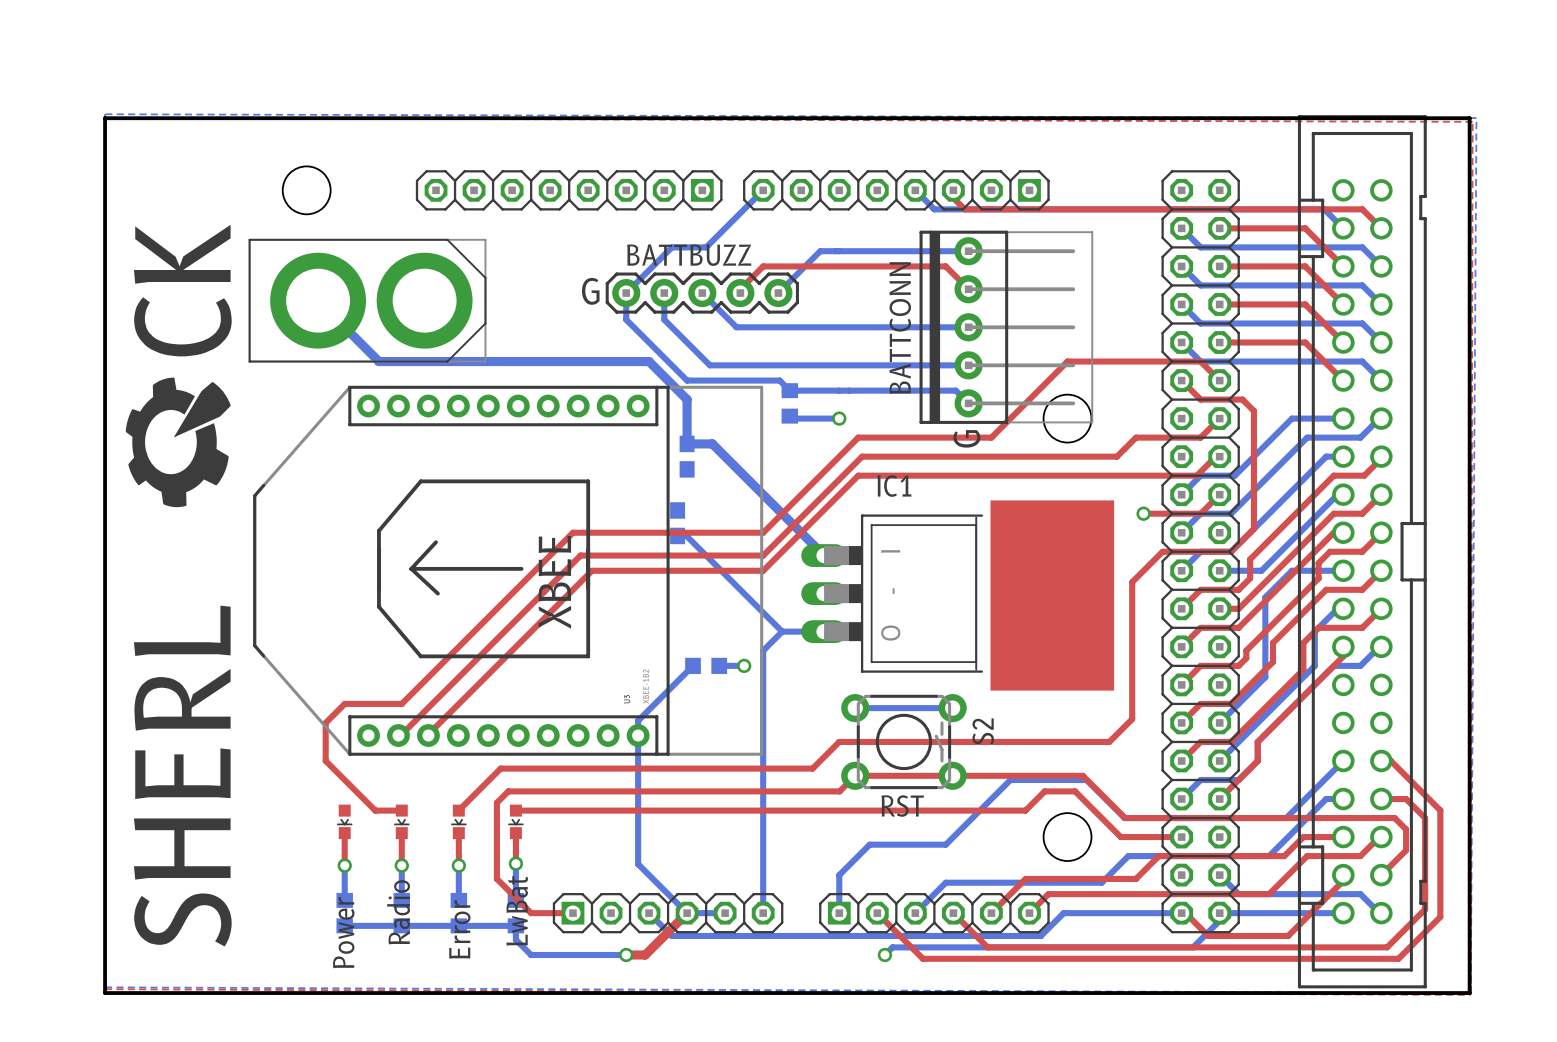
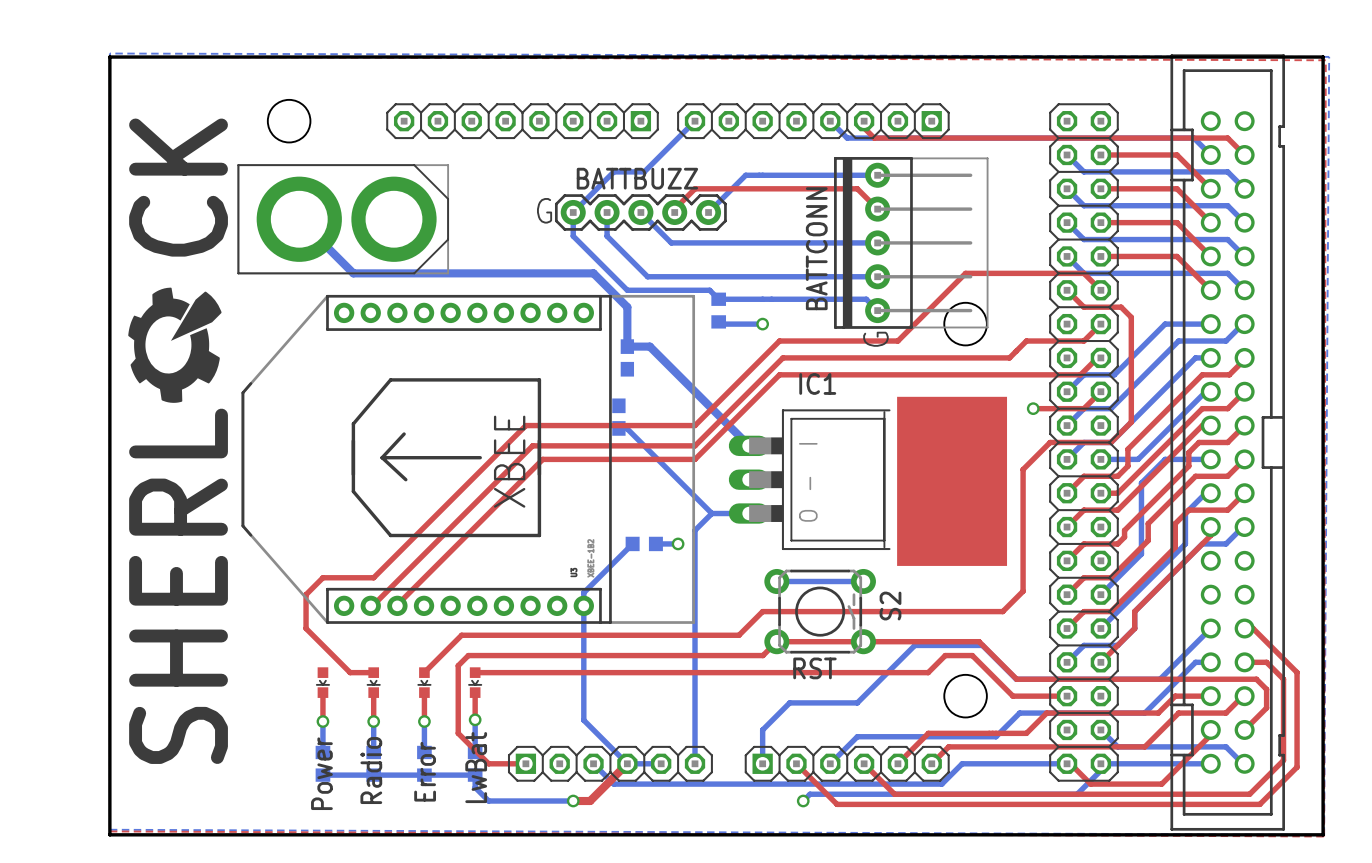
drawing shape: [125, 224, 232, 947] -> [128, 118, 228, 764]

